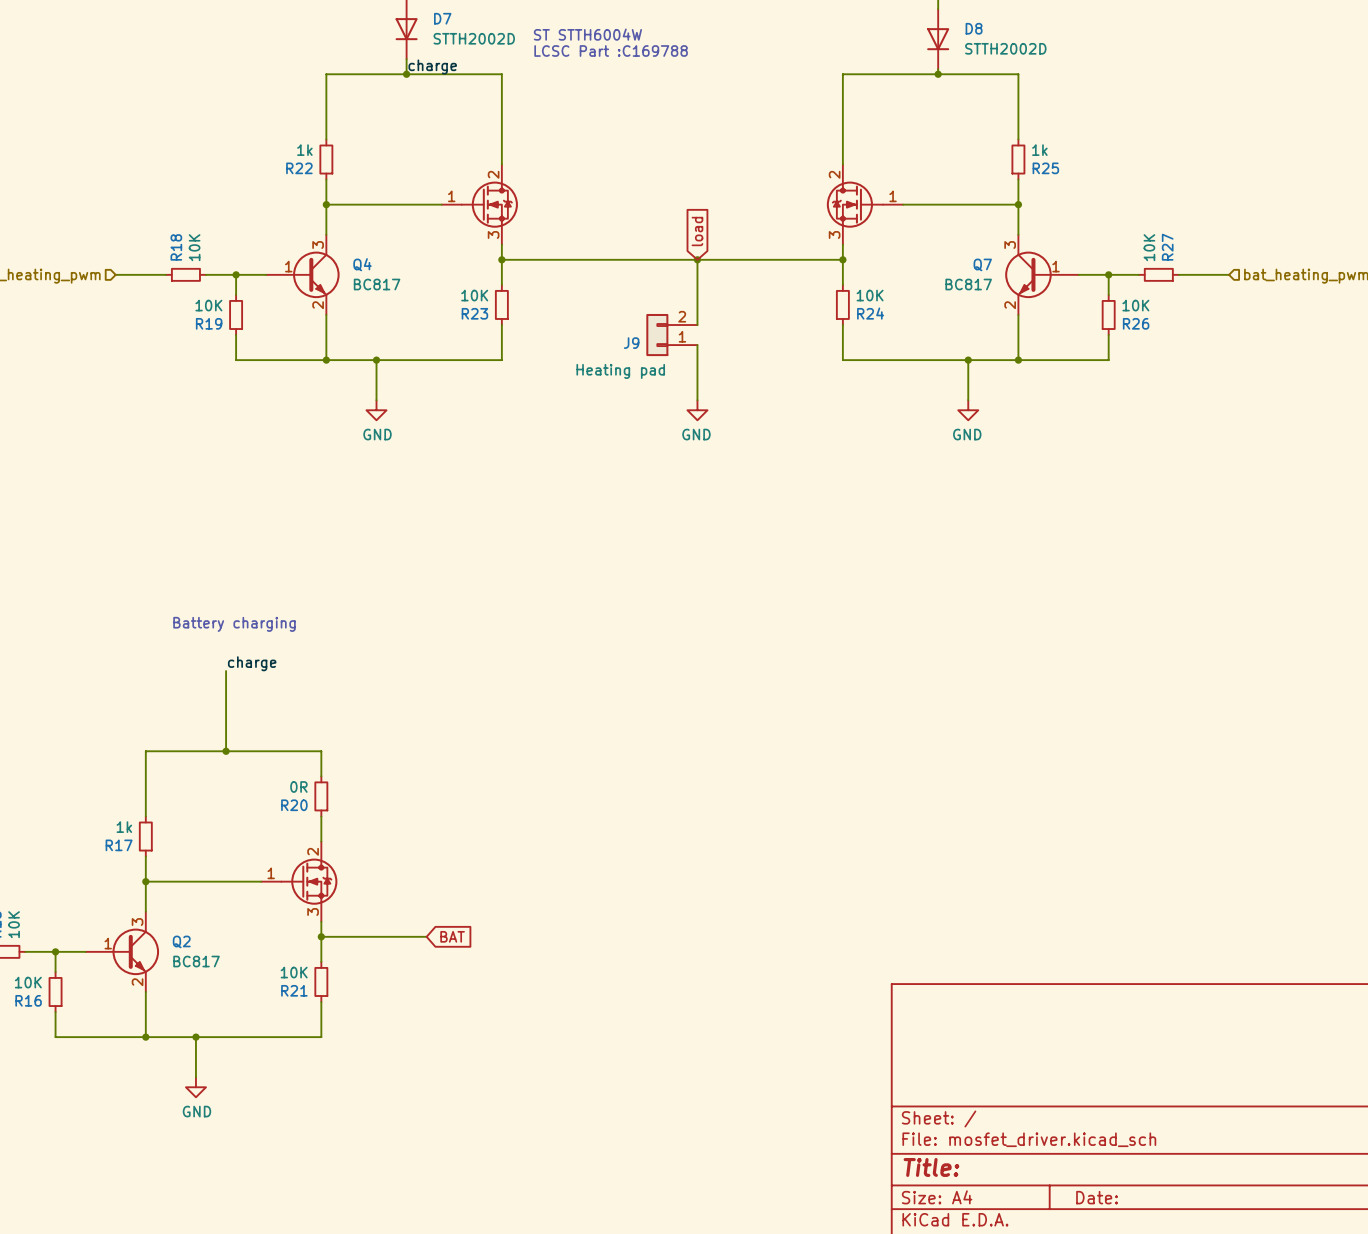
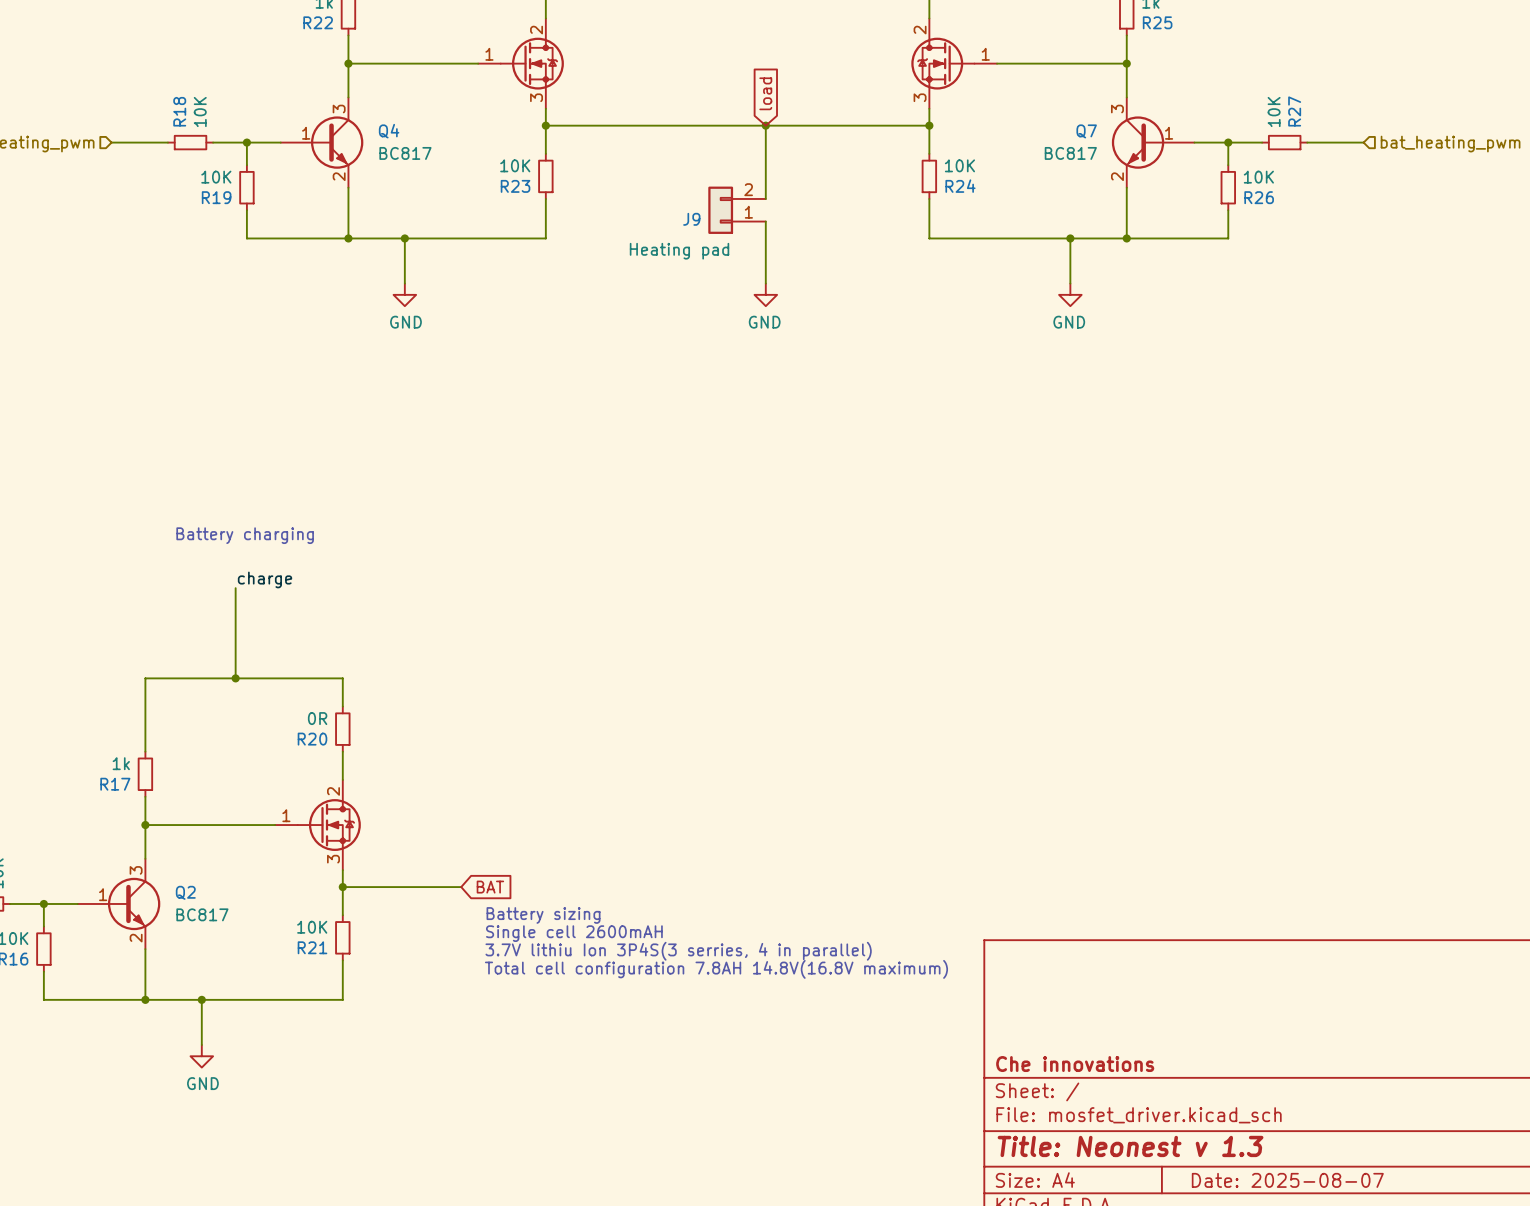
text: none -> Battery sizing (543, 915)
text: none -> Single cell 2600mAH (574, 933)
text: none -> 3.7V lithiu Ion 3P4S(3 serries, 4 in parallel) (678, 951)
text: none -> Total cell configuration 7.8AH 14.8V(16.8V maximum) (716, 969)
title block: none -> Che innovations (1075, 1064)
title block: Title: (931, 1167) -> Title: Neonest v 1.3 (1130, 1146)
title block: Date: (1097, 1197) -> Date: 2025-08-07 (1287, 1180)

